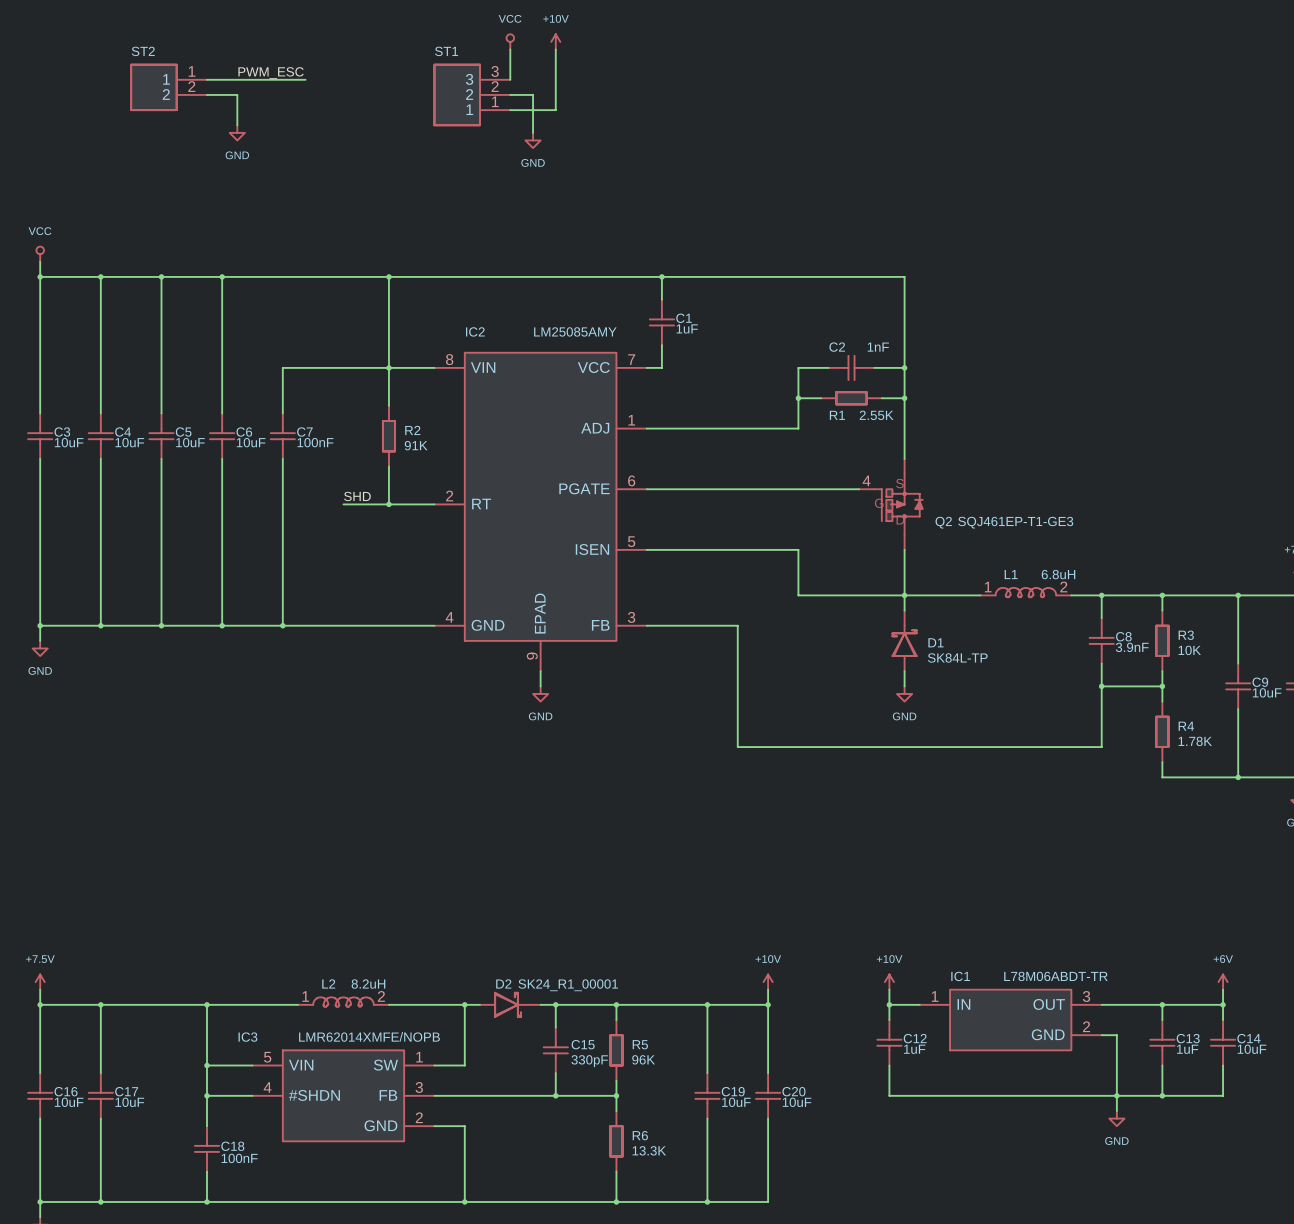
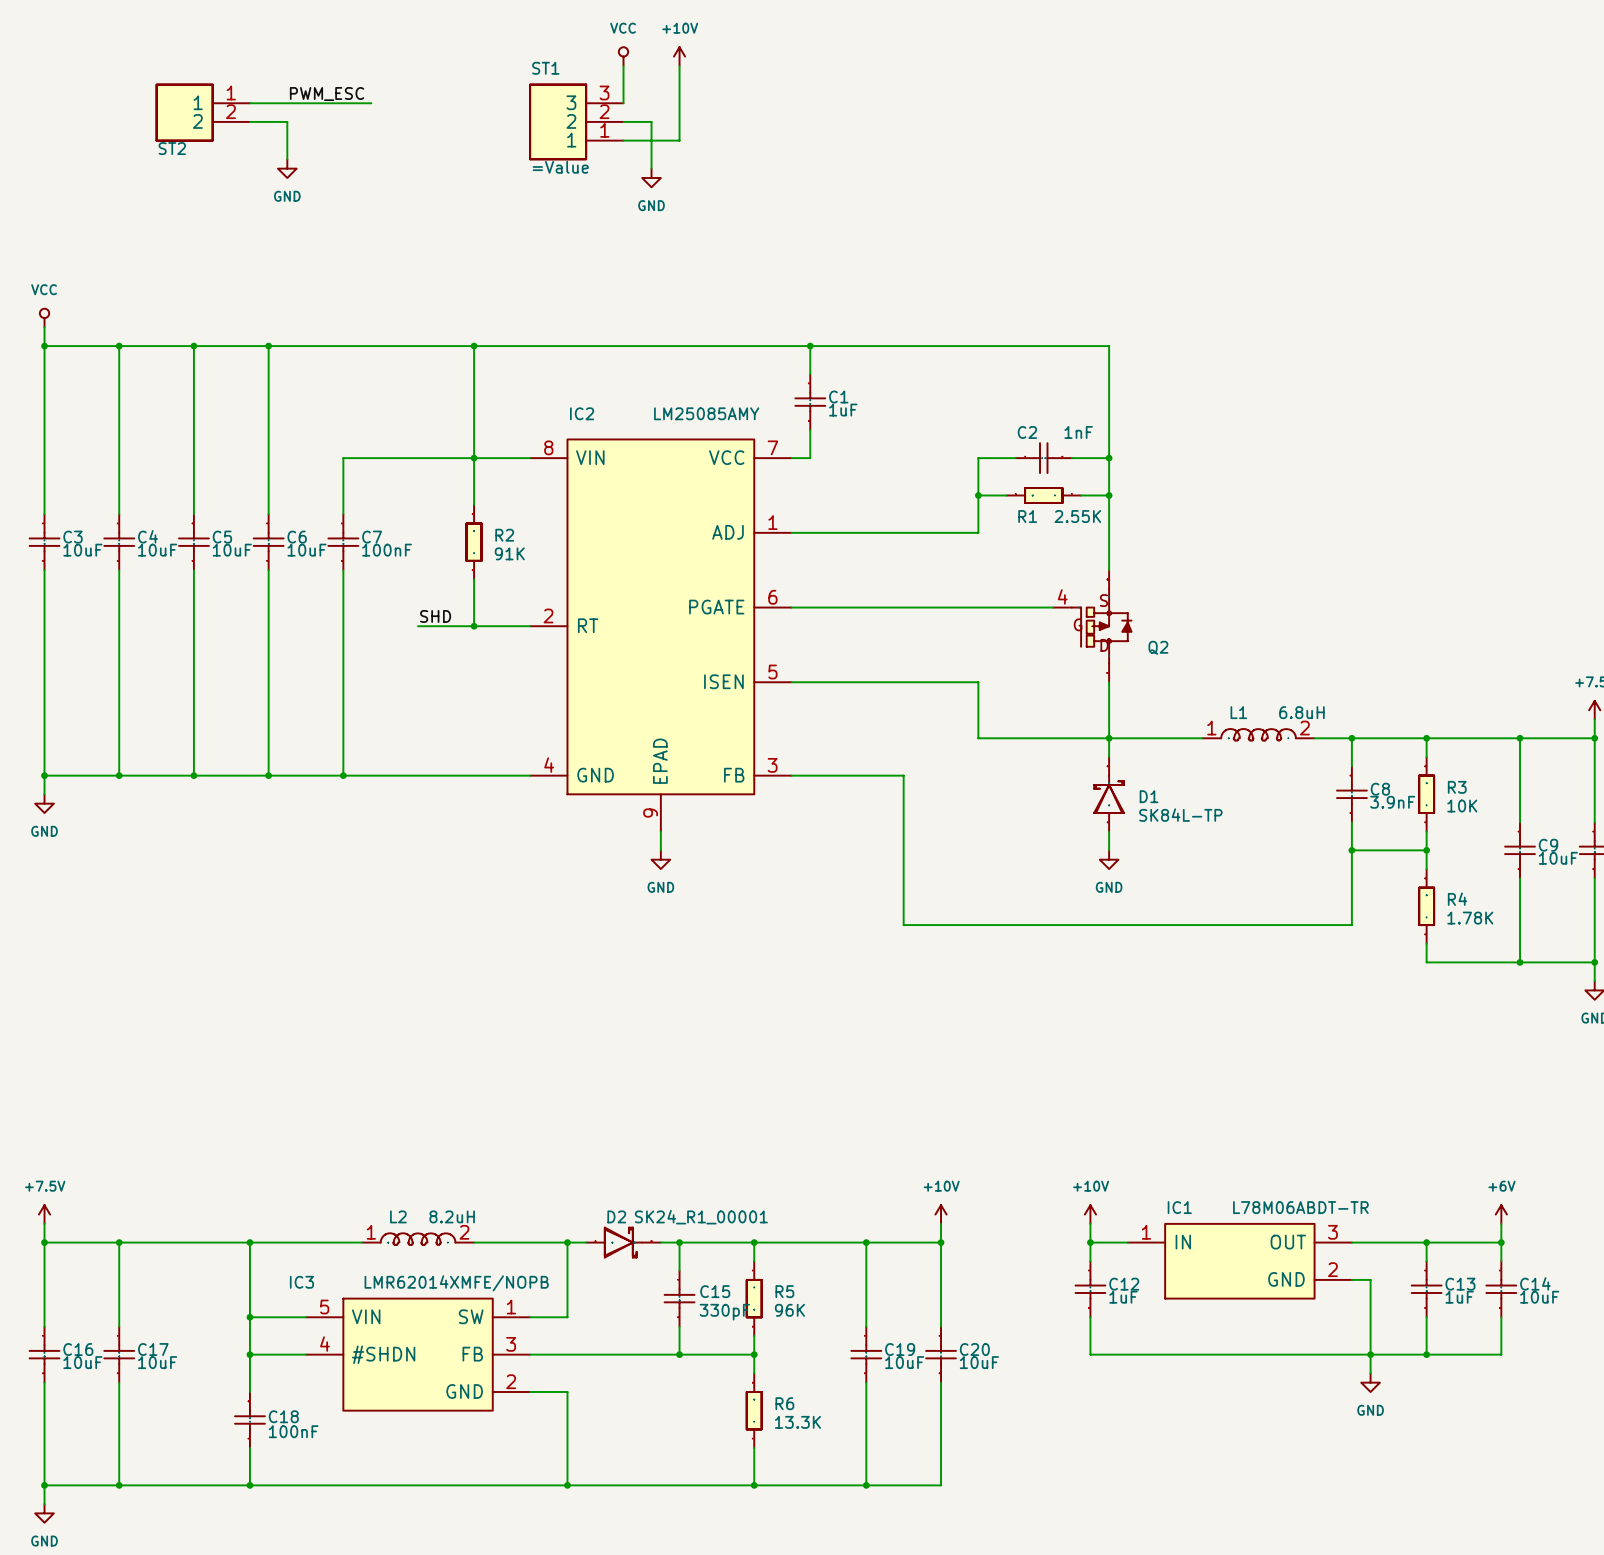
ST2 name position: ST2 (143, 51) -> ST2 (172, 148)
ST1 value: none -> =Value (560, 167)
Q2 value: SQJ461EP-T1-GE3 (1015, 522) -> none

